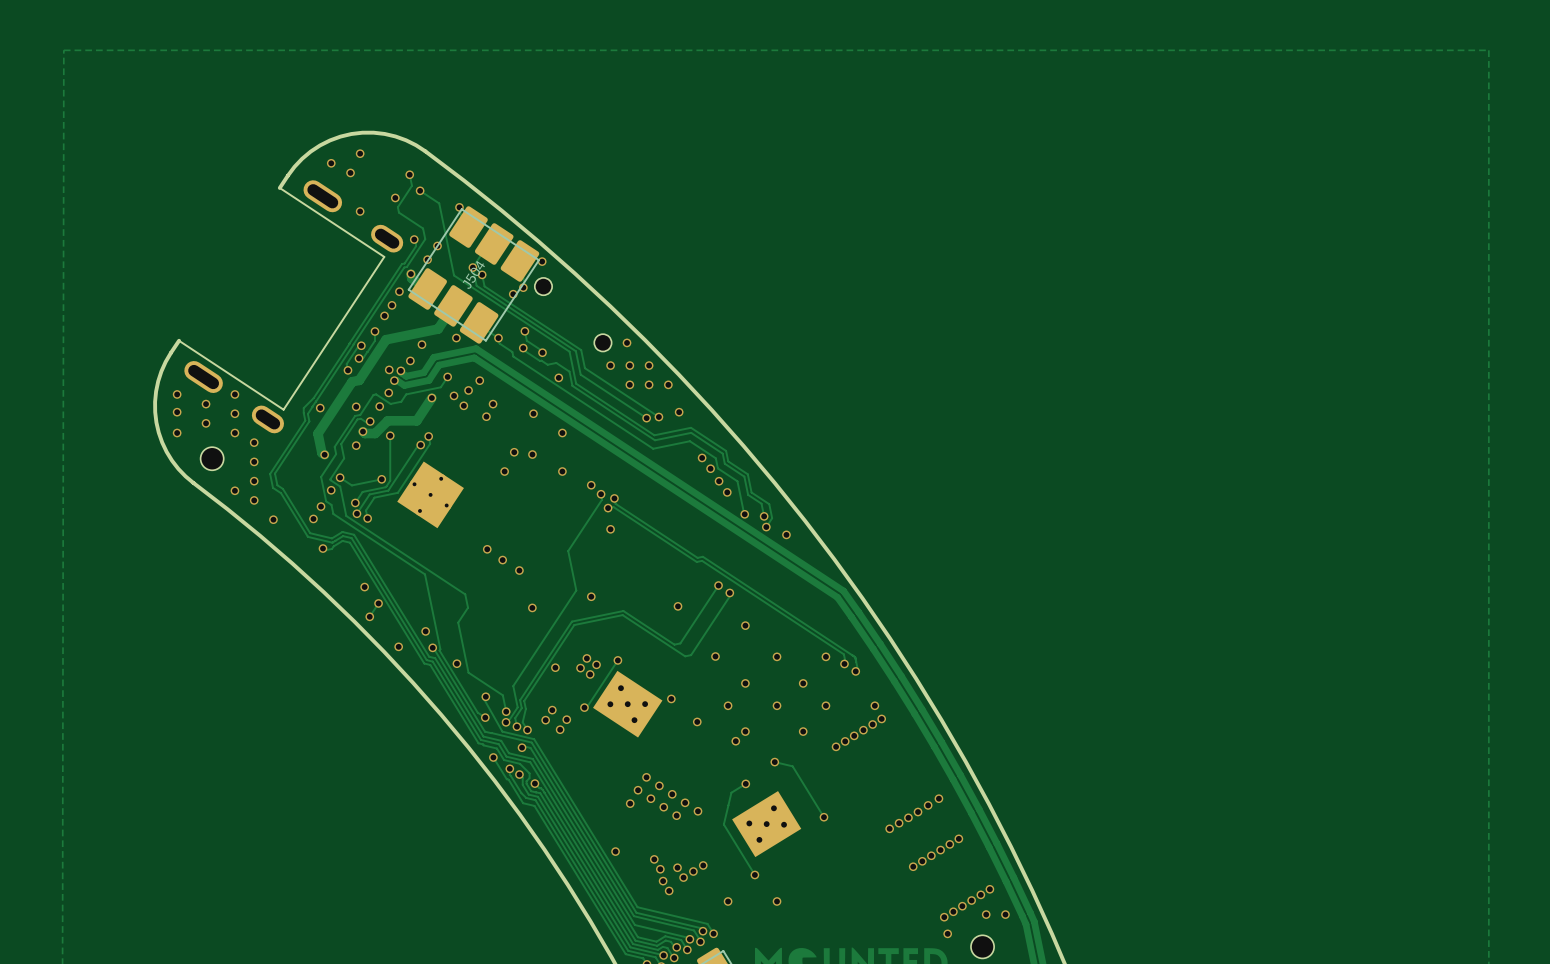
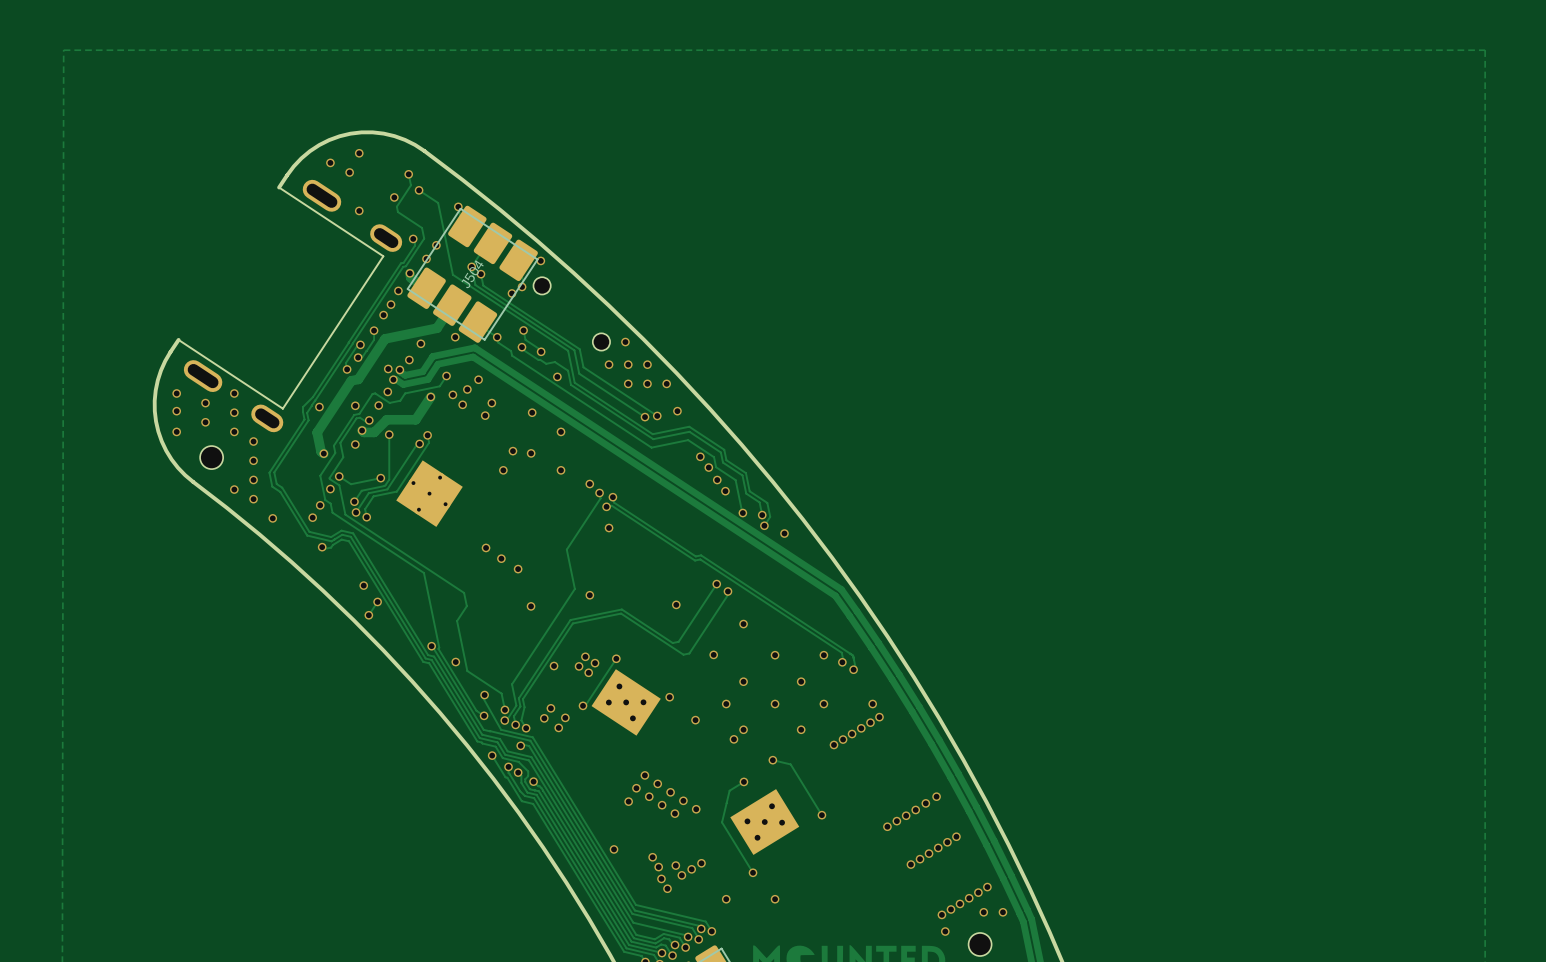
via: (425, 631) -> none
via: (398, 646) -> none

